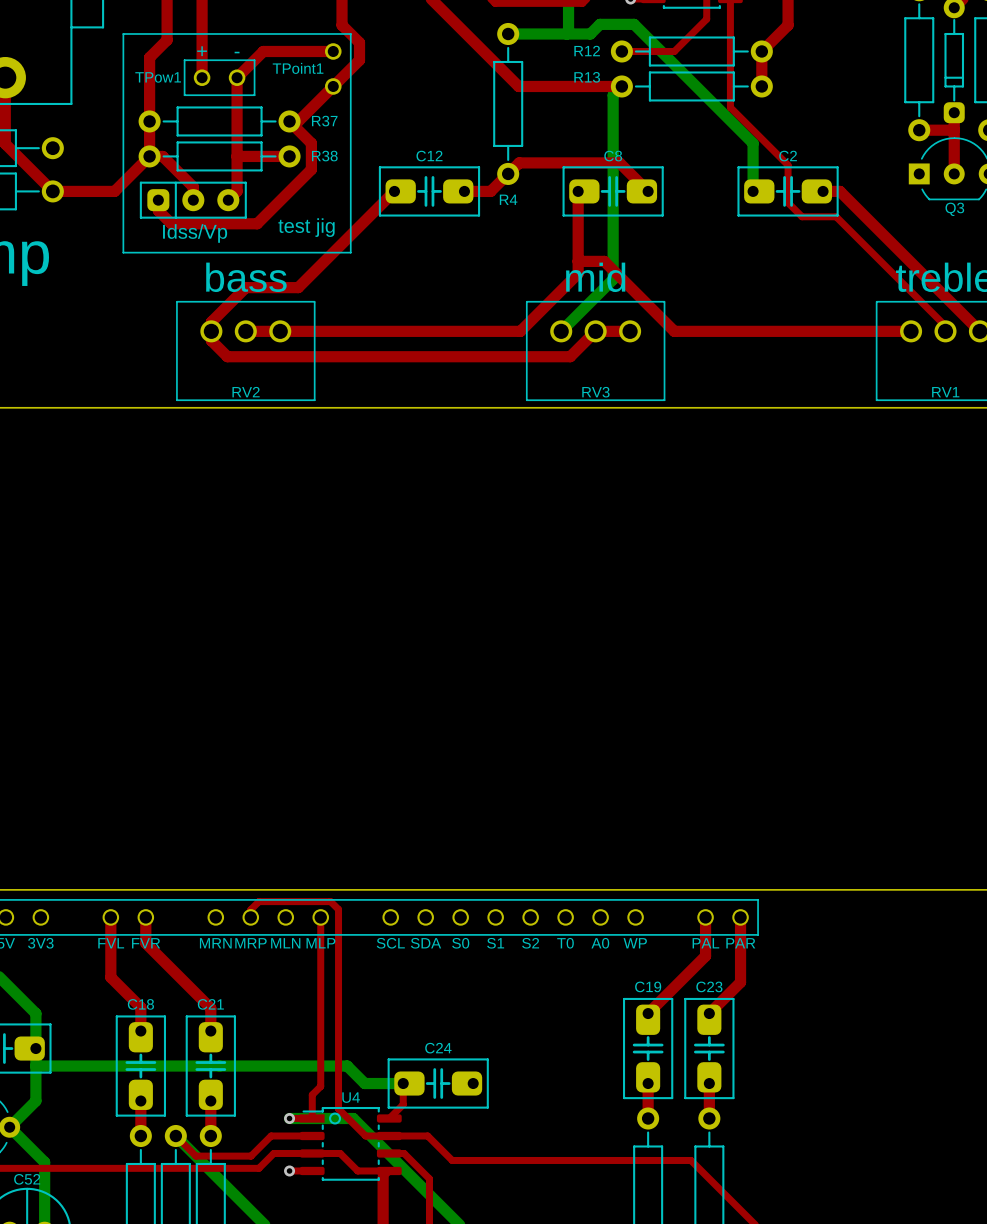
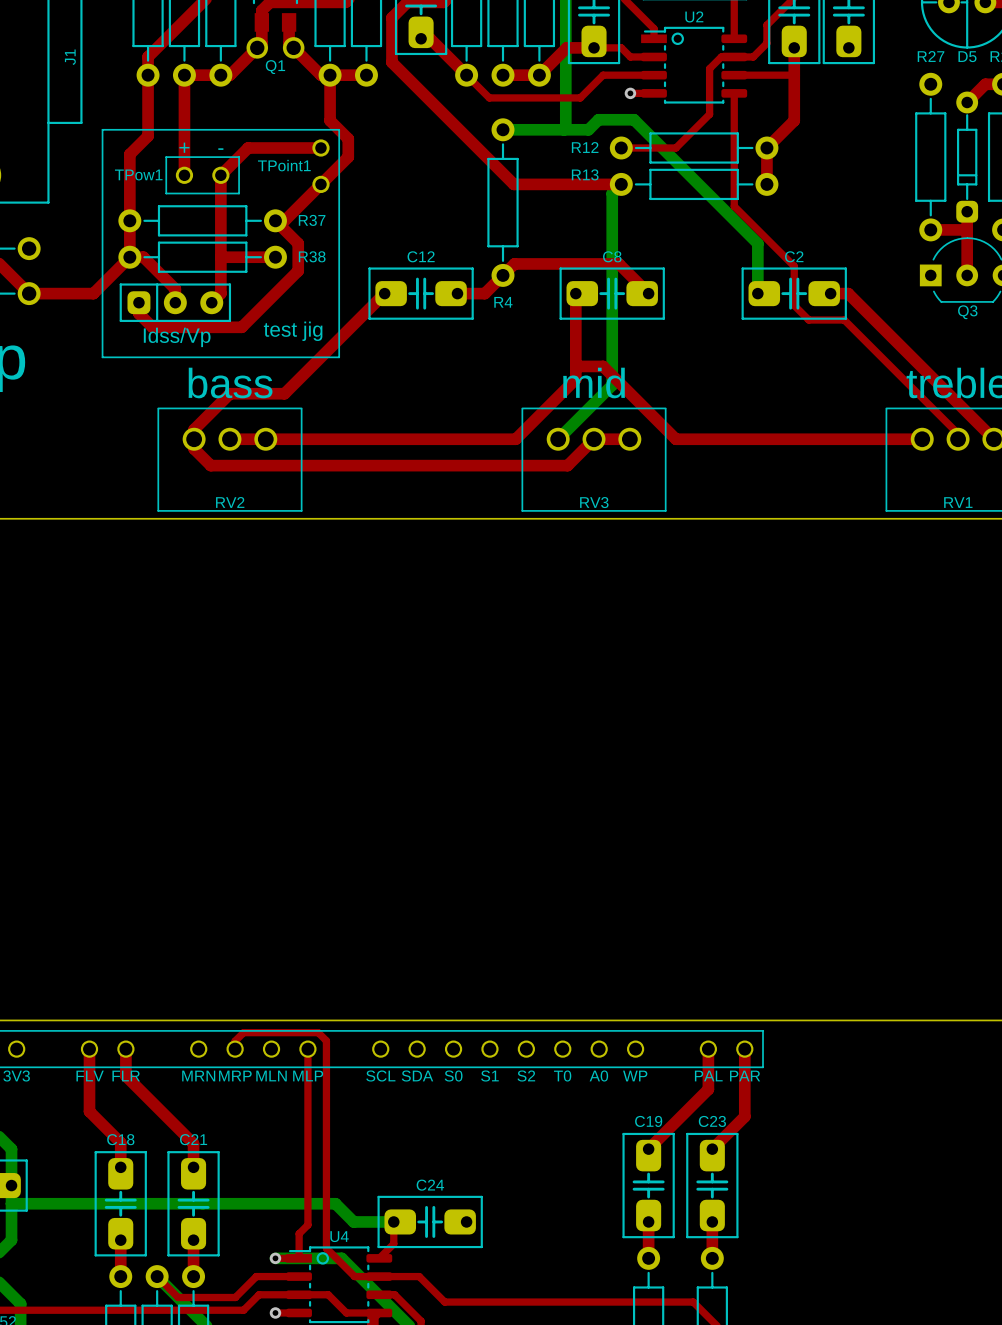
part text: FVL (111, 943) -> FLV (90, 1076)
part text: FVR (146, 943) -> FLR (126, 1076)

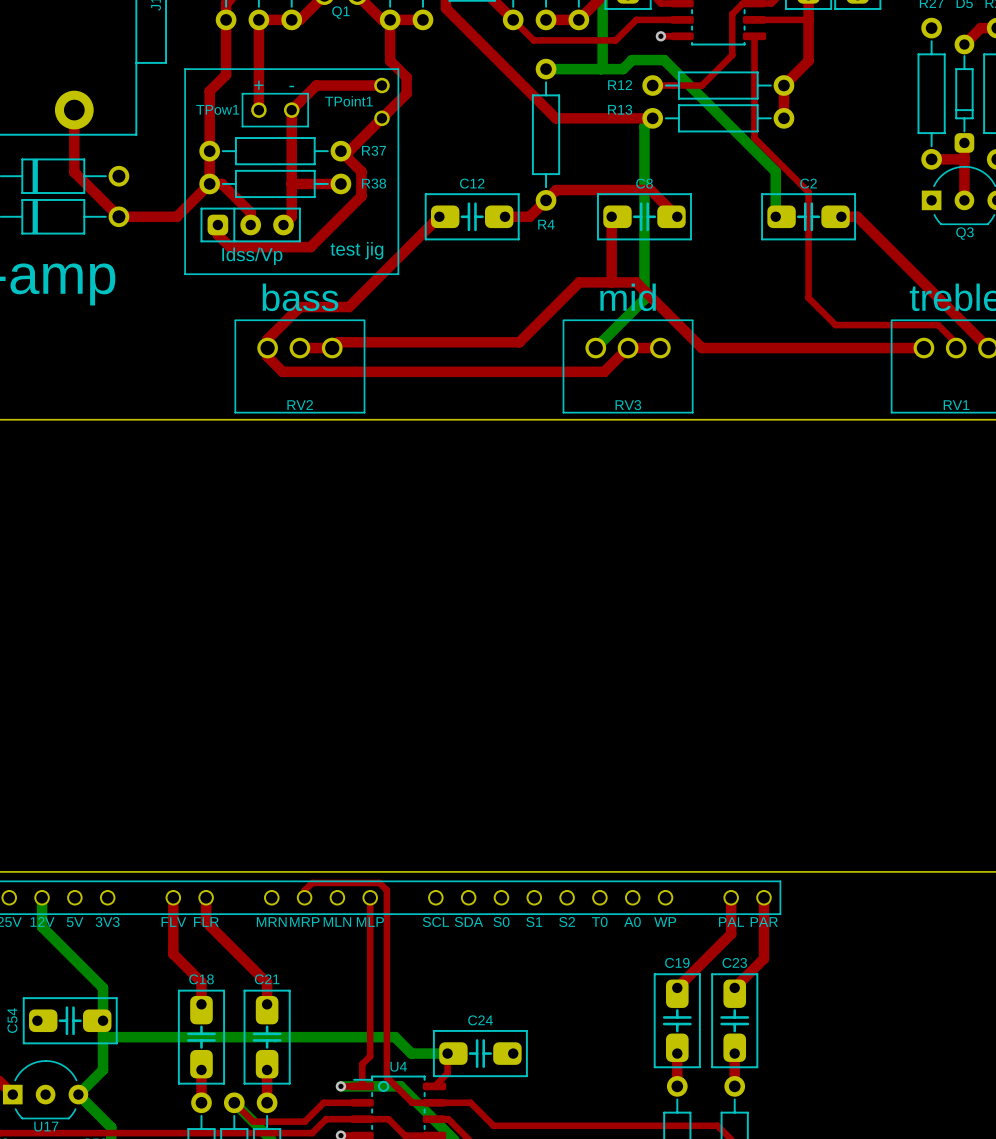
top track: (794, 305) (808, 320) (844, 320) (938, 413) -> (808, 227) (808, 298) (835, 325) (938, 325)
top track: (575, 366) (575, 379) (515, 439) (265, 439) -> (611, 282) (579, 282) (519, 342) (337, 342) (332, 348)

